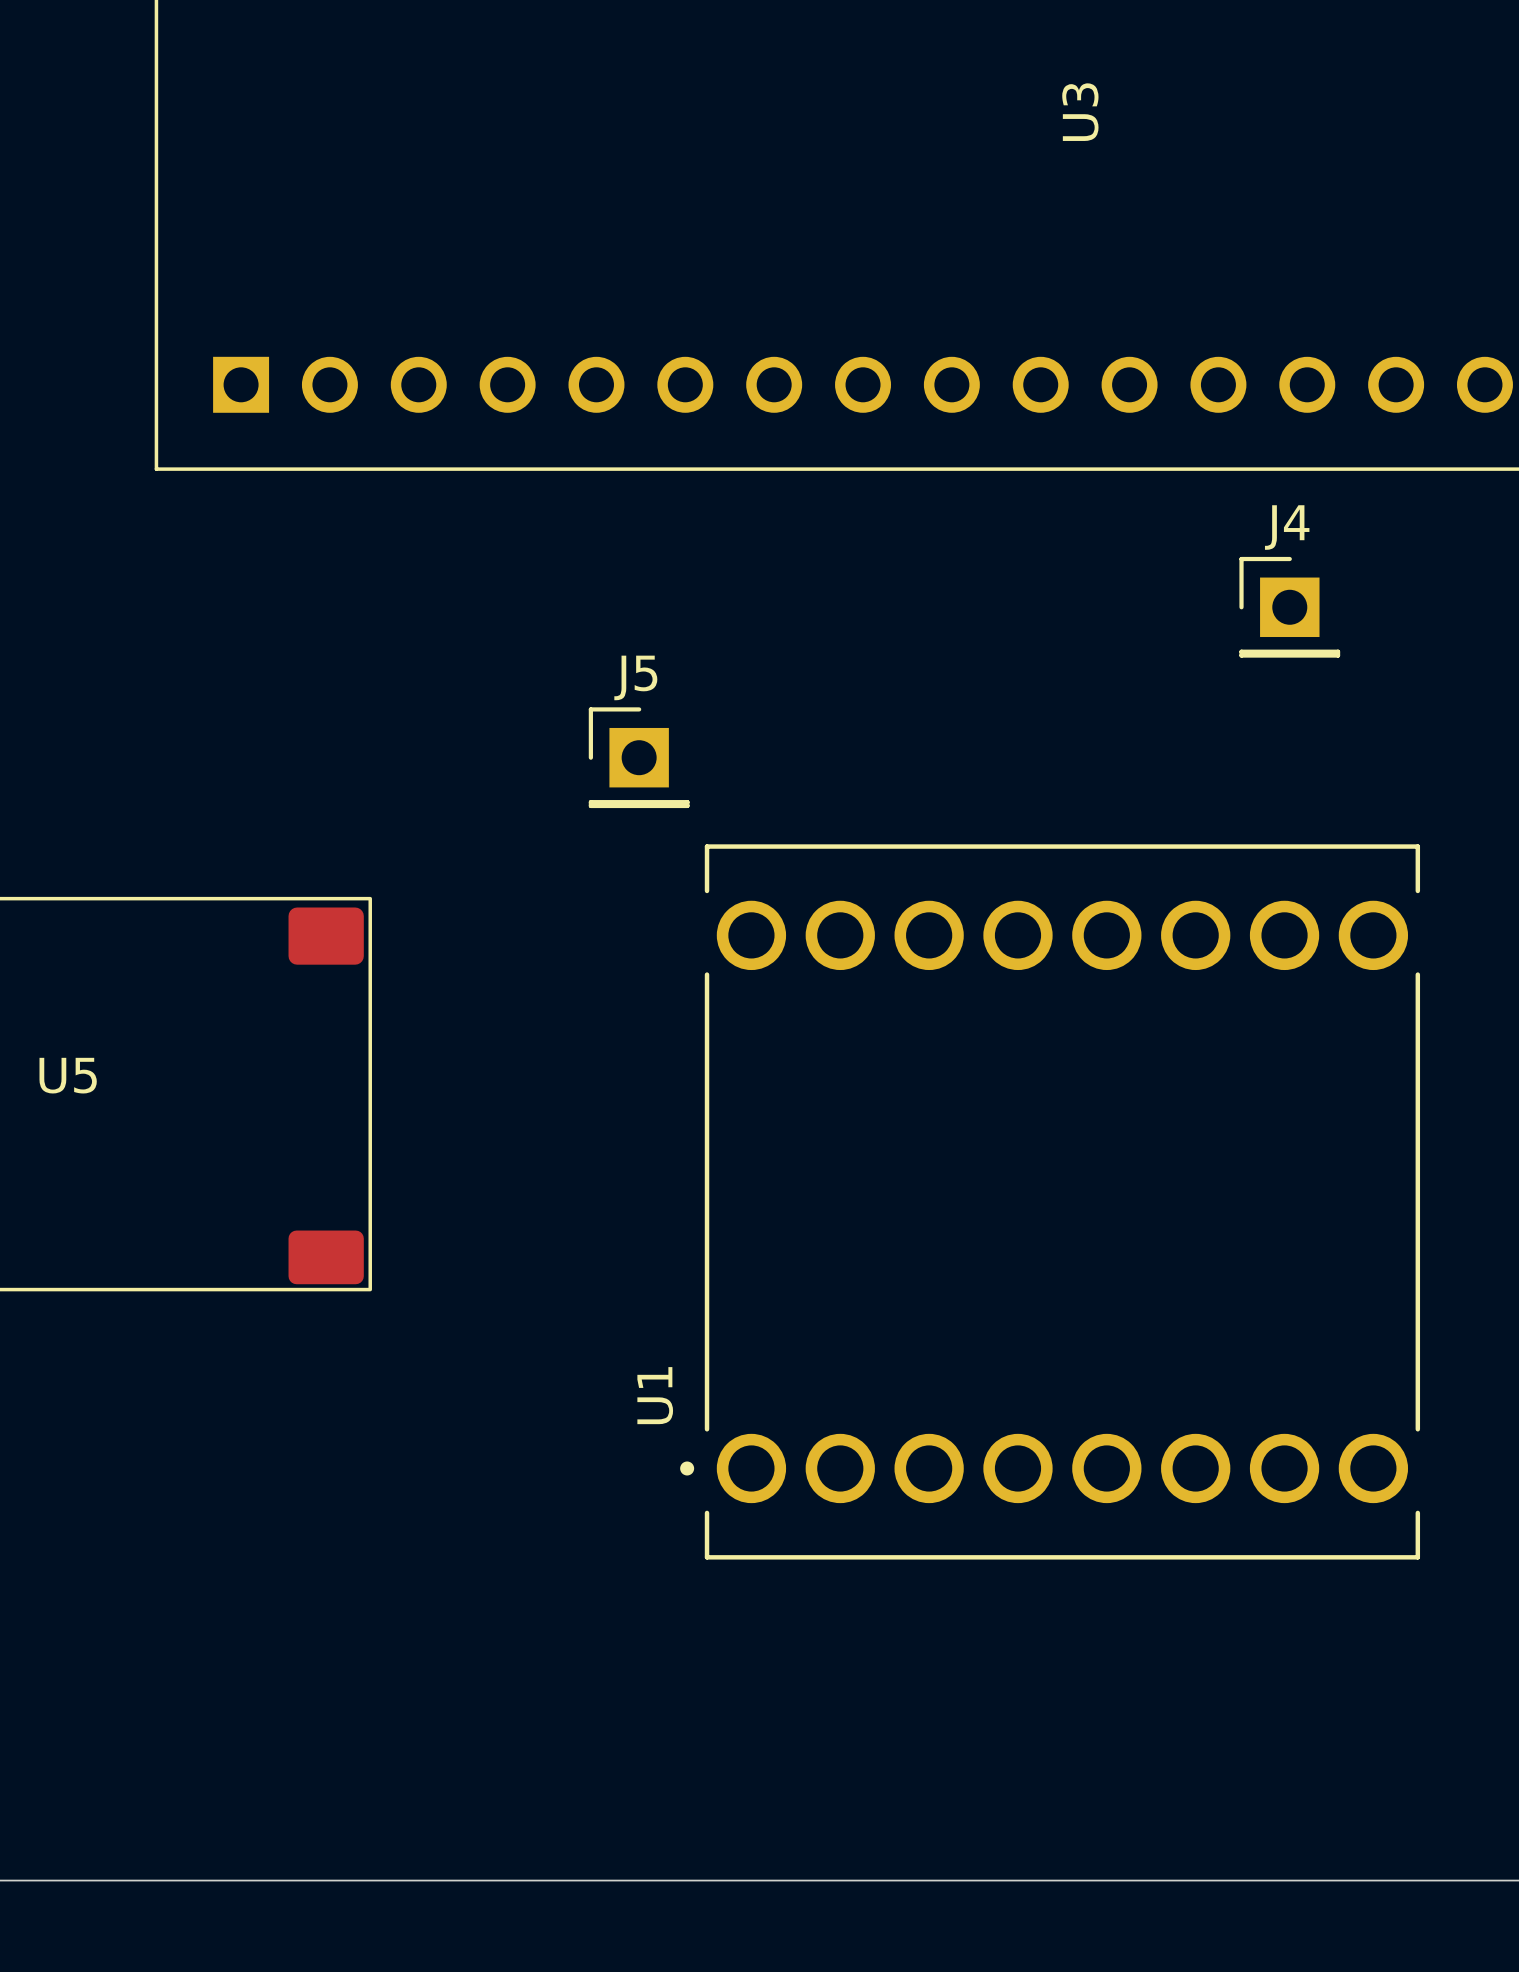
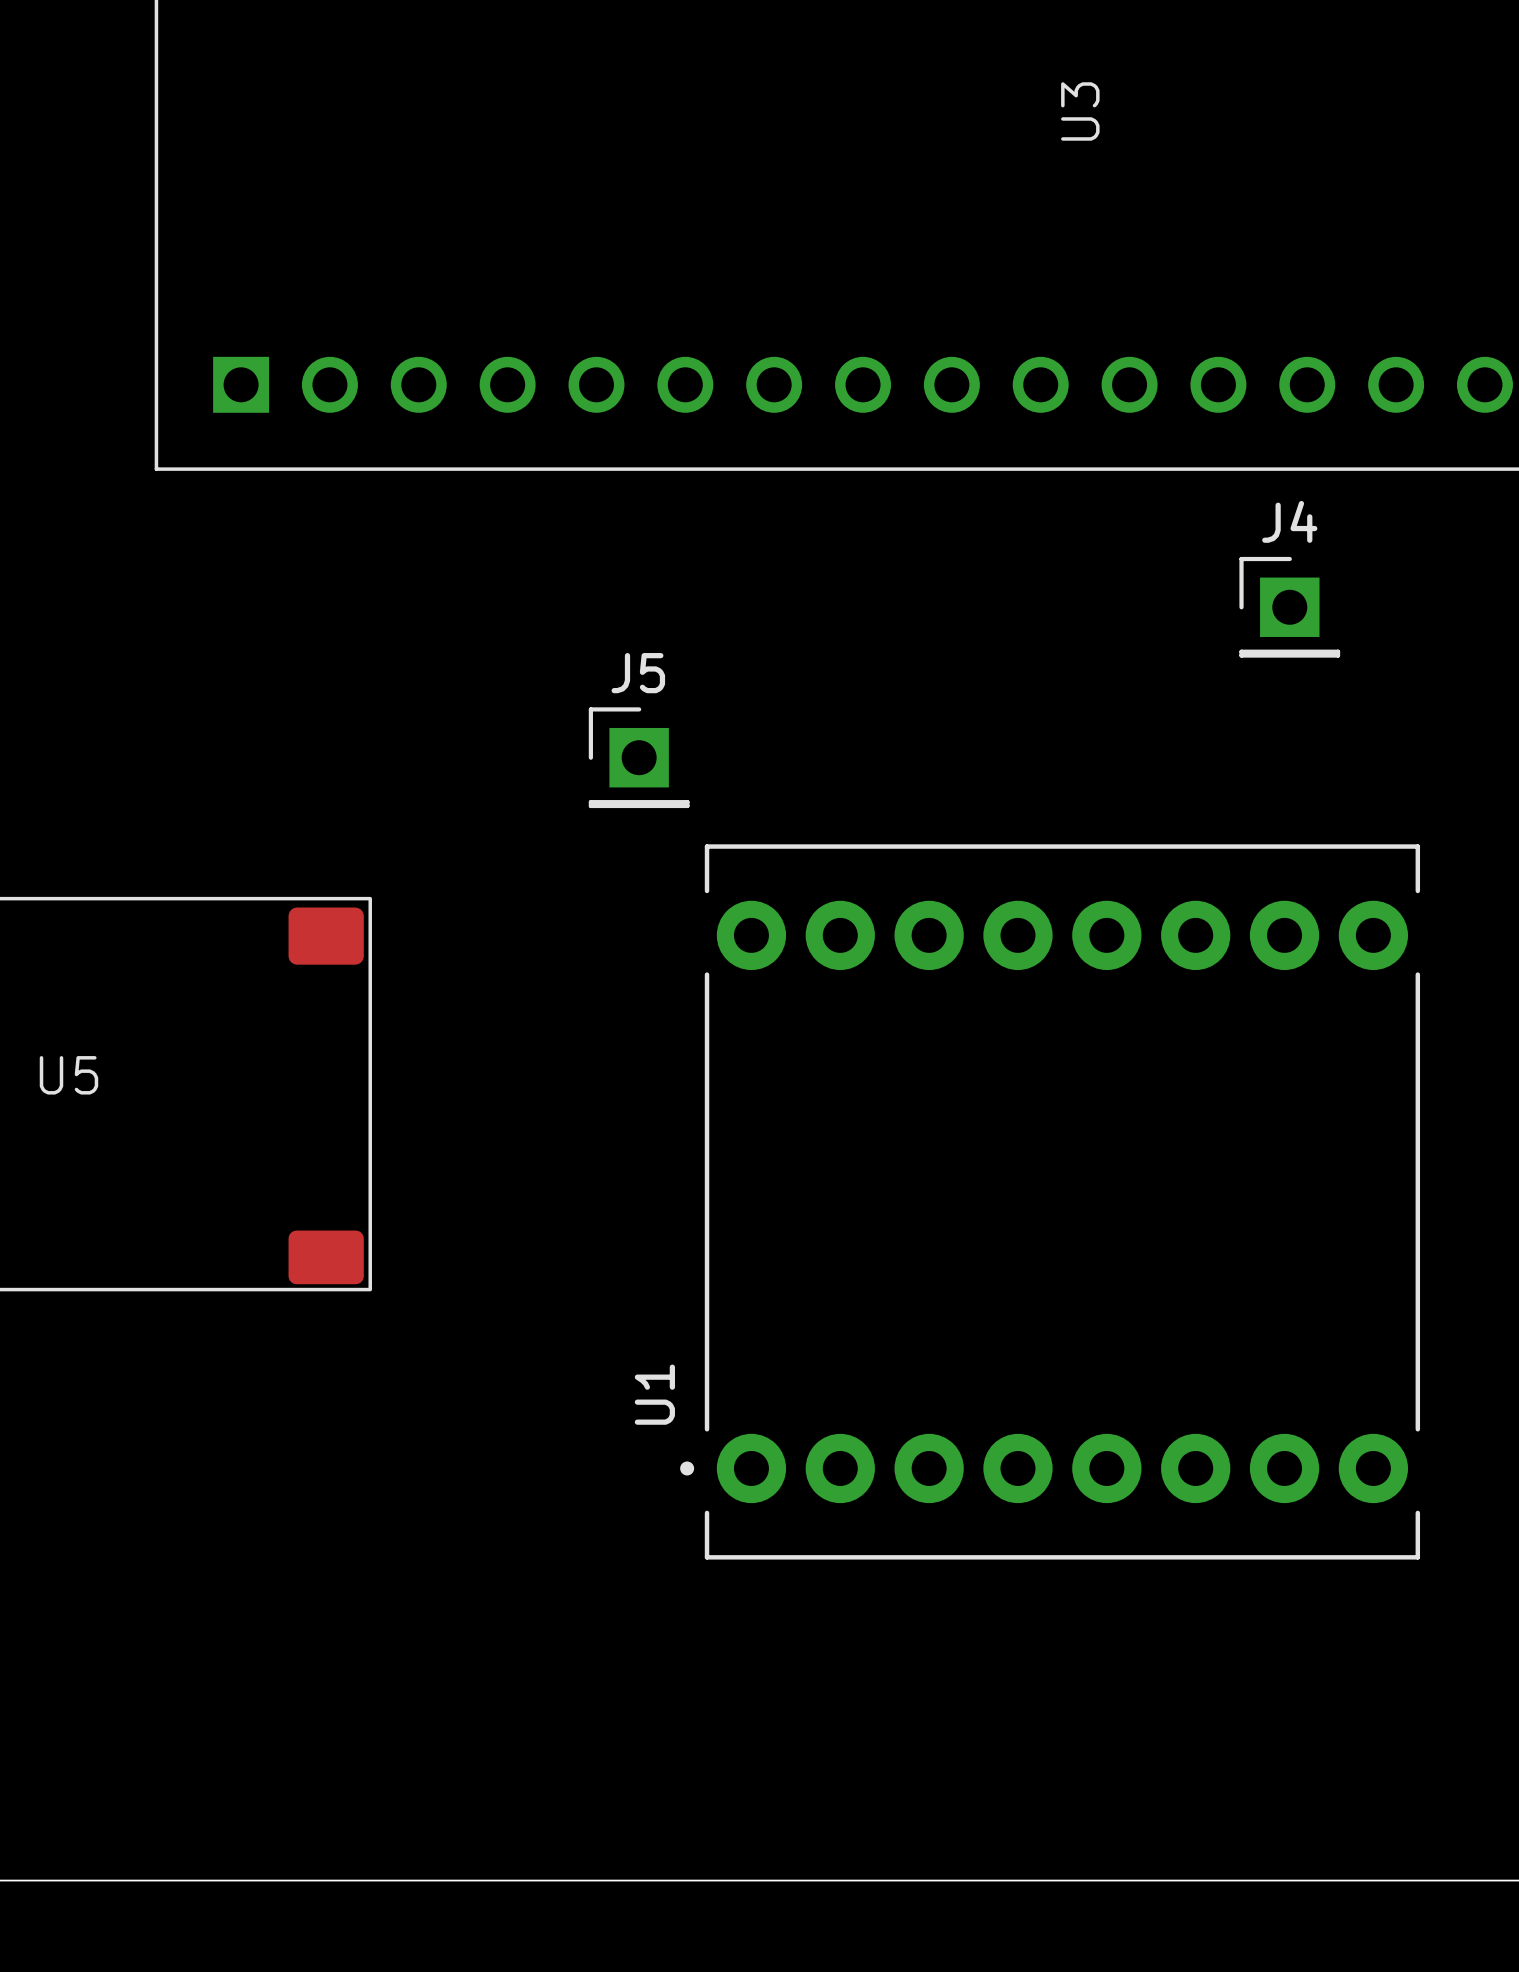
U1 footprint: [680, 844, 1421, 1560] -> [680, 844, 1421, 1560]

